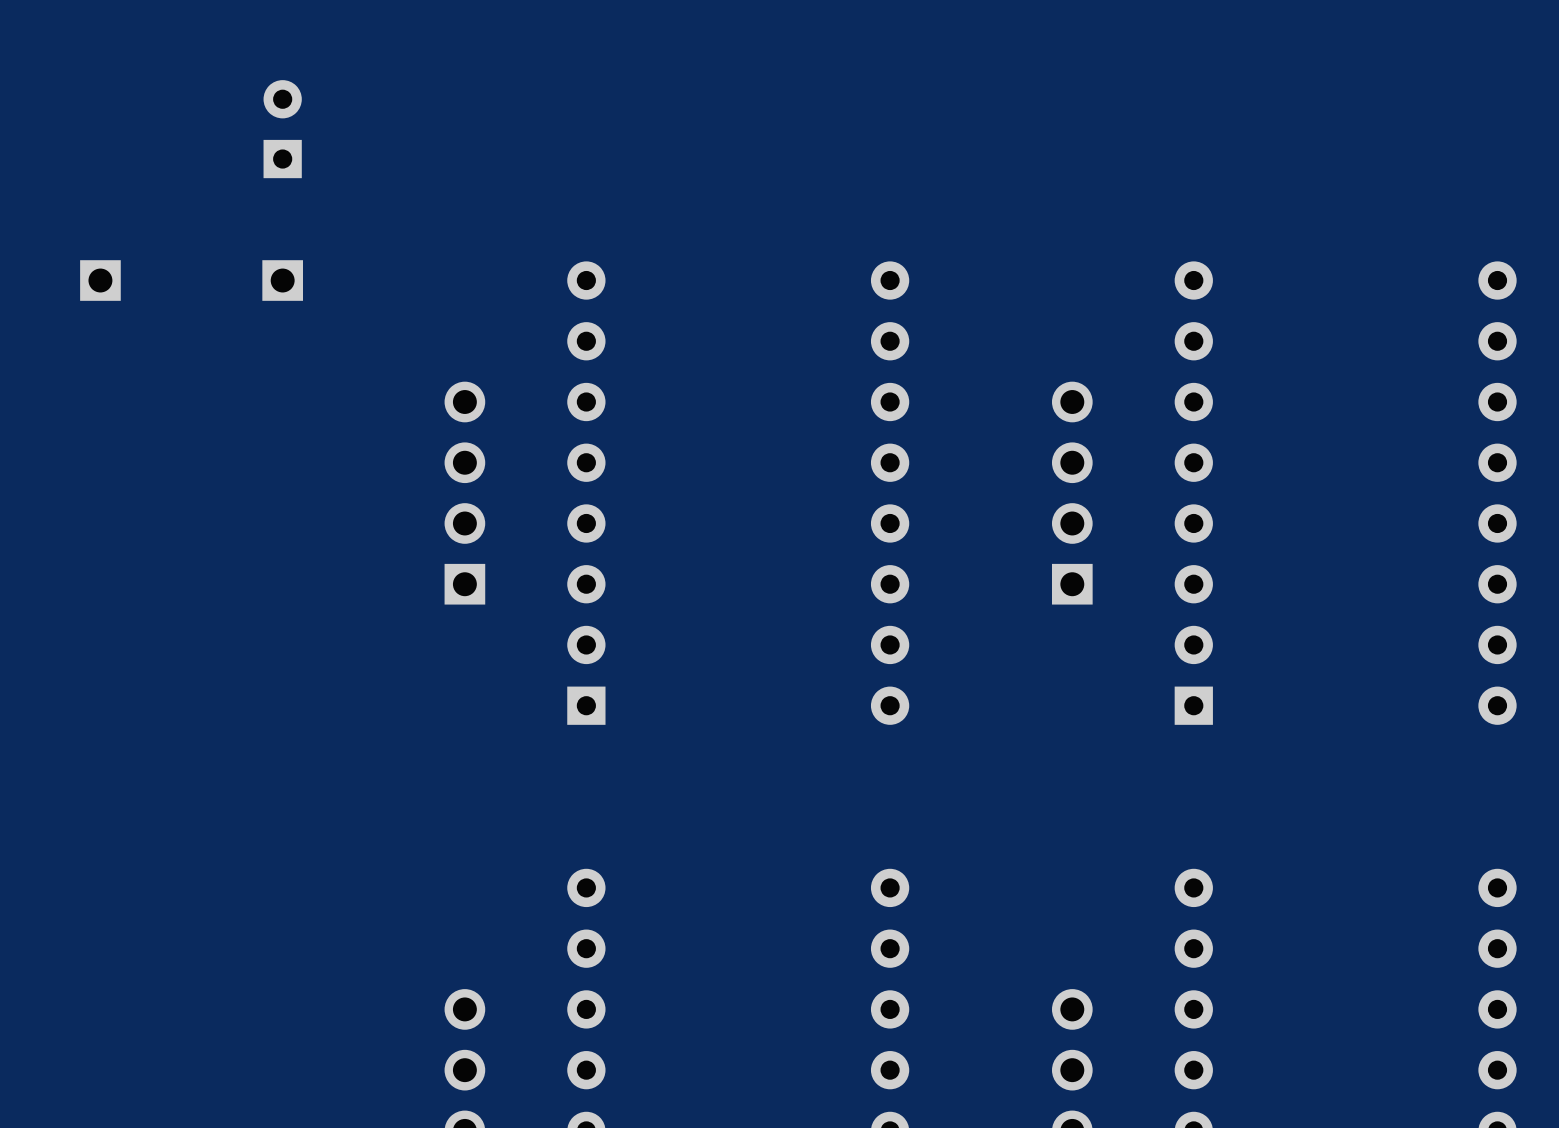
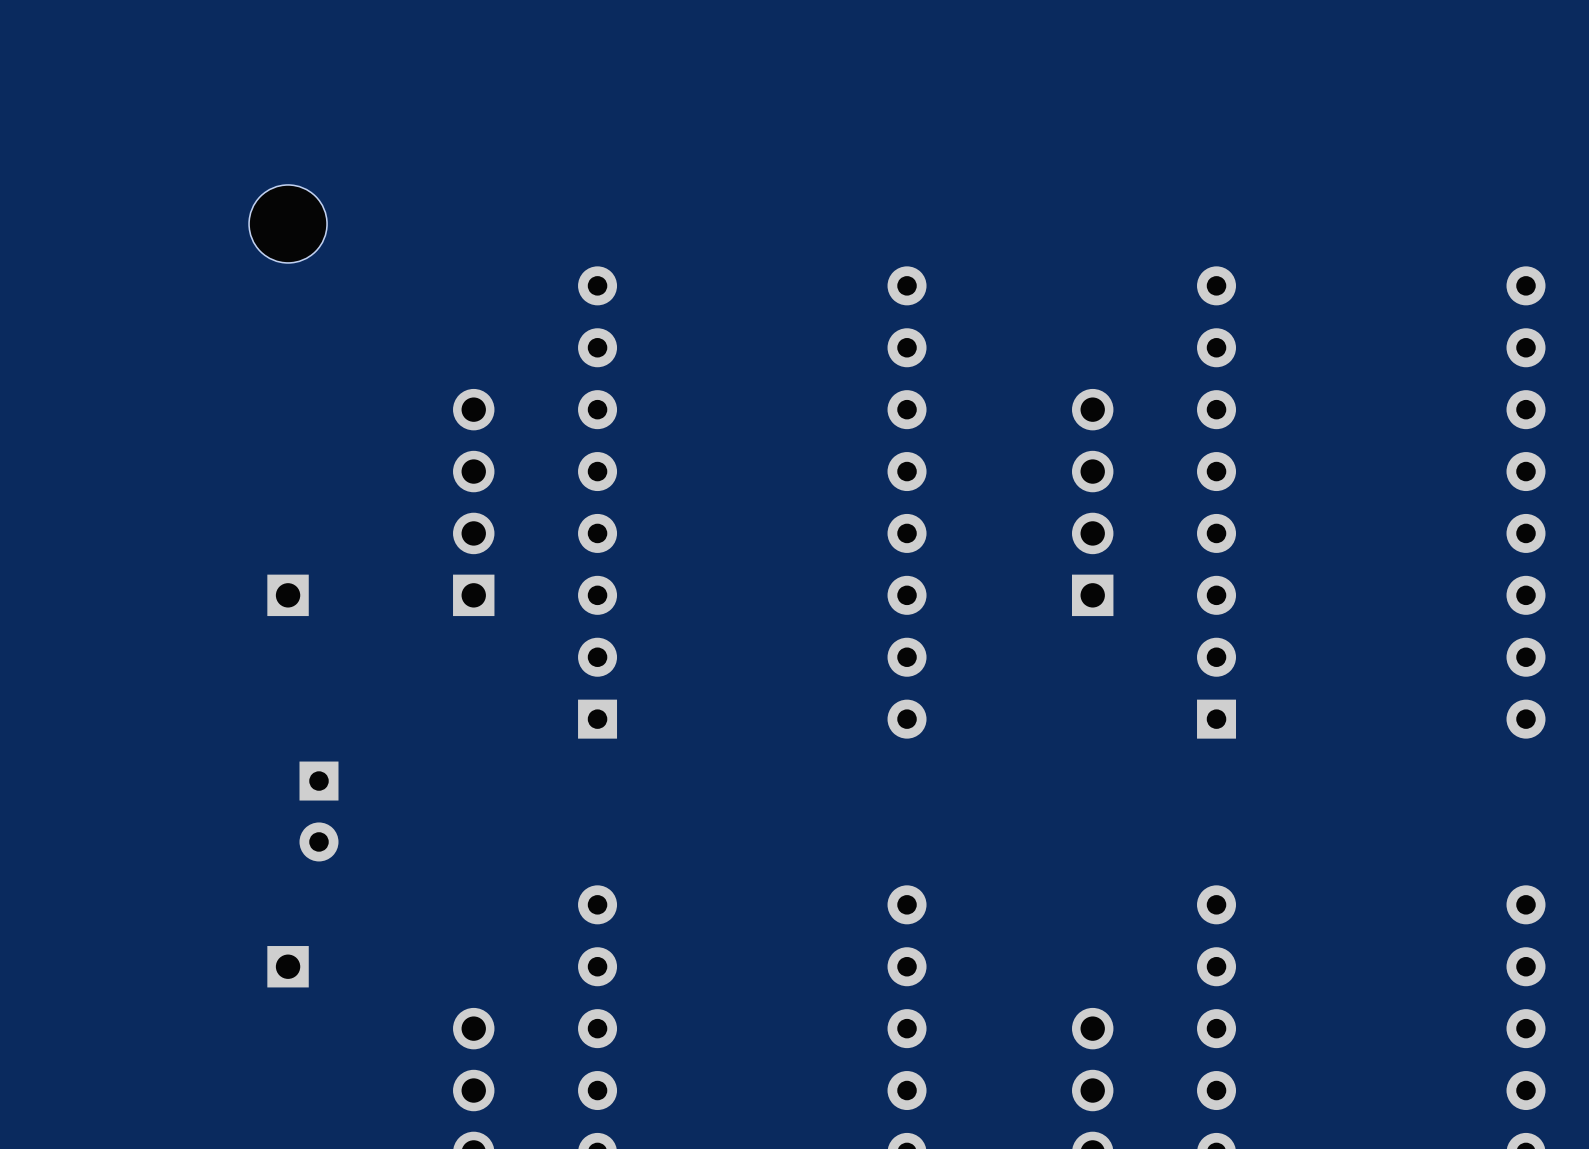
part: (282, 129) -> none
part: none -> (288, 223)
part: (100, 280) -> none
part: (282, 280) -> none
part: none -> (288, 595)
part: none -> (318, 811)
part: none -> (288, 966)

